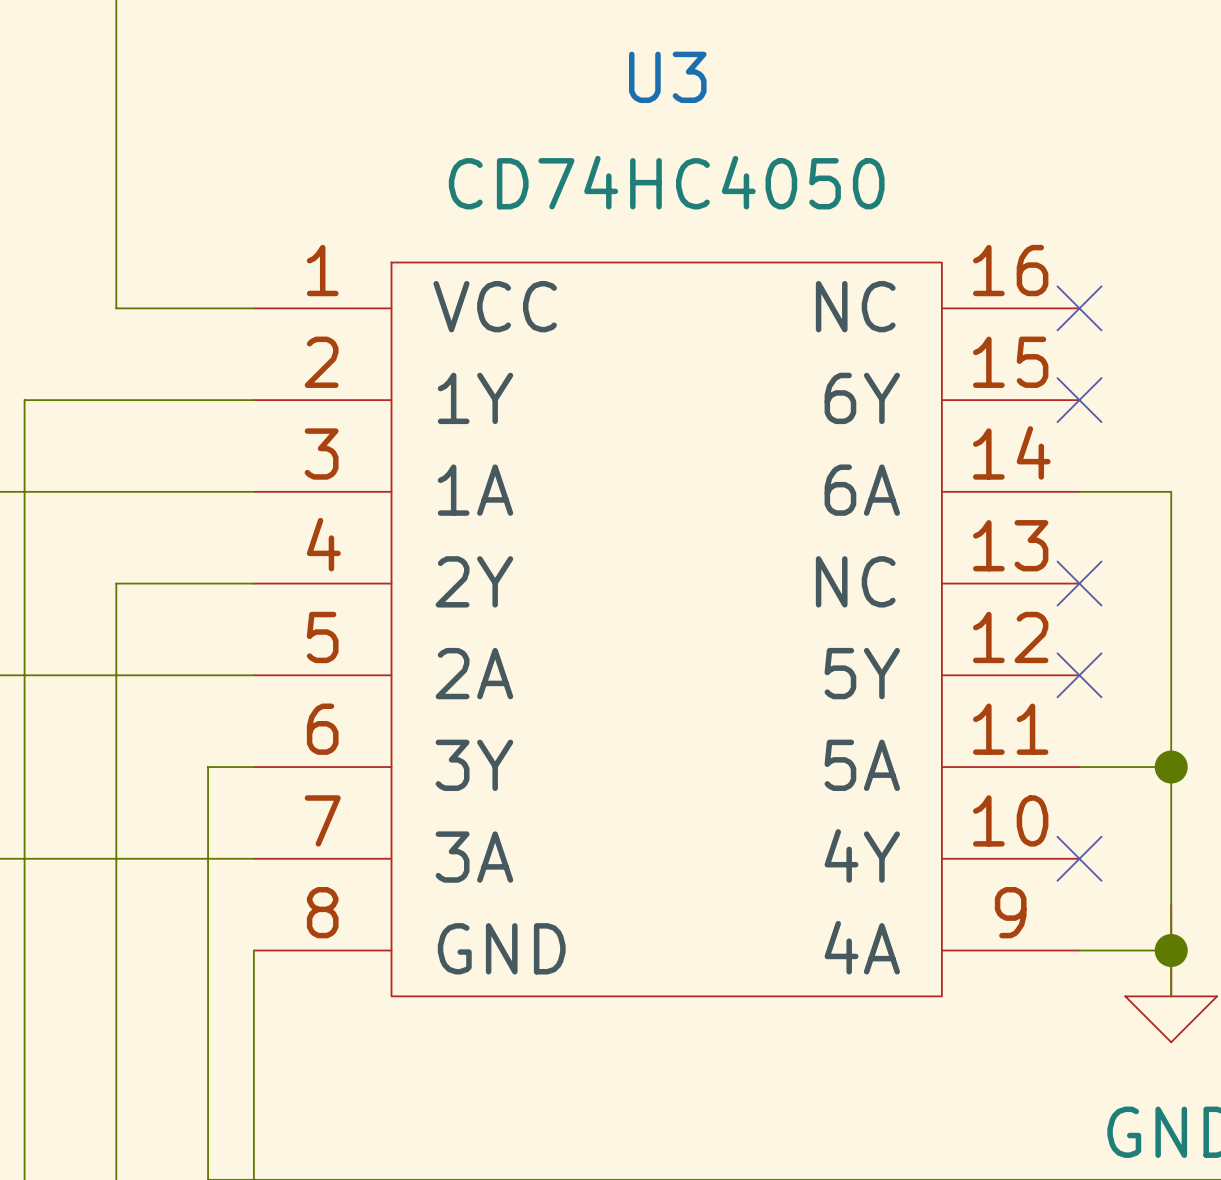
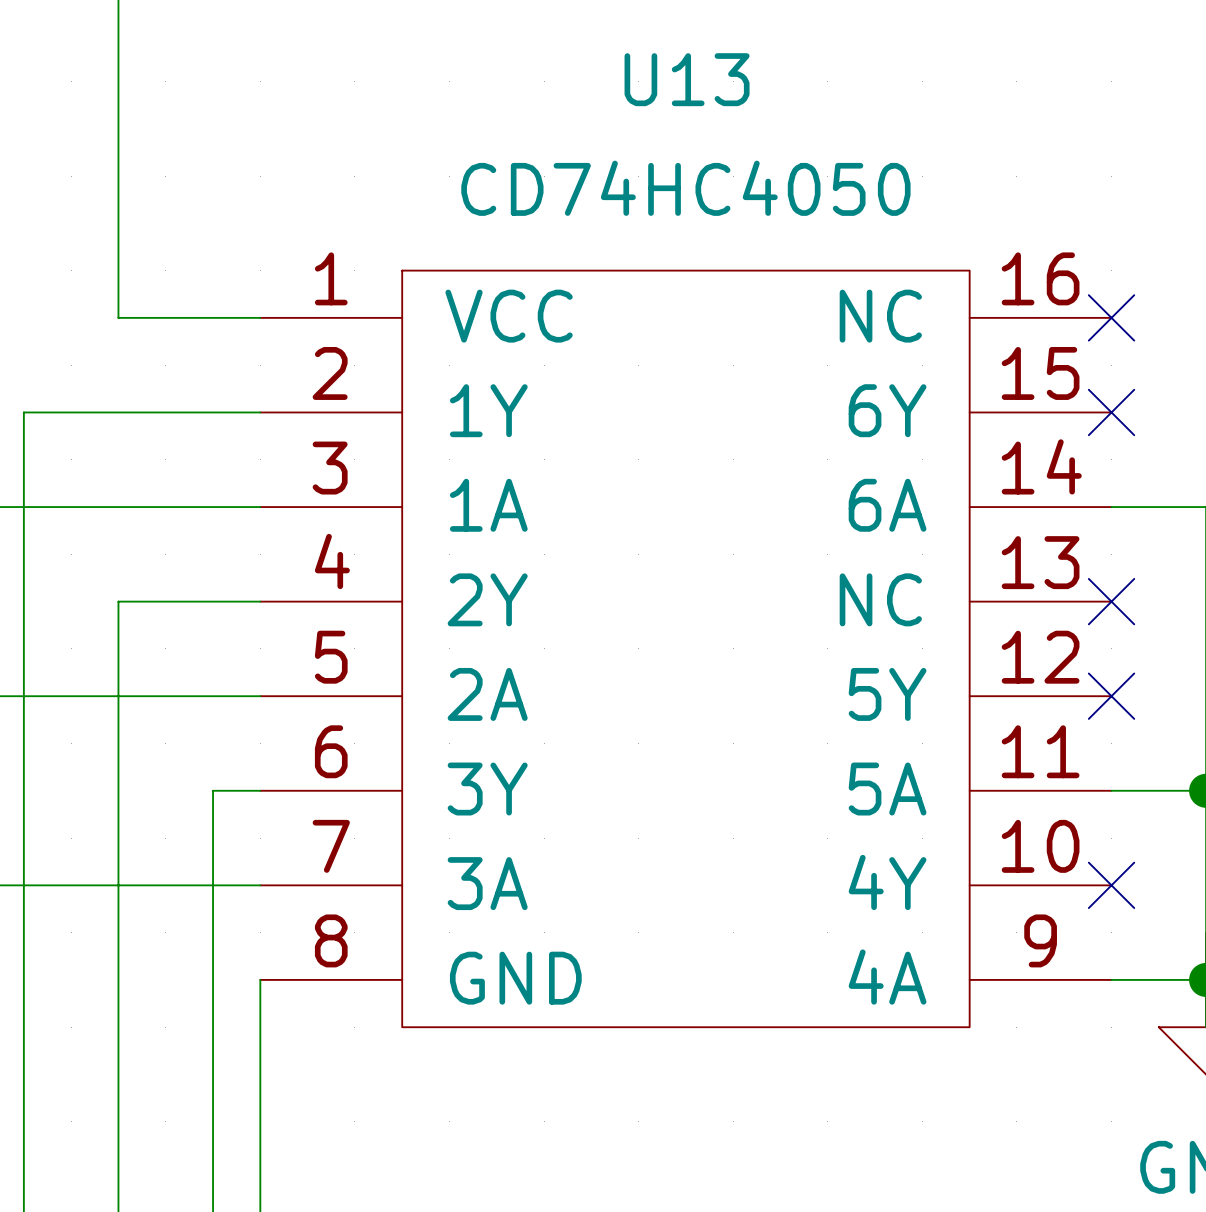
U3 name: U3 (667, 77) -> U13 (687, 79)

